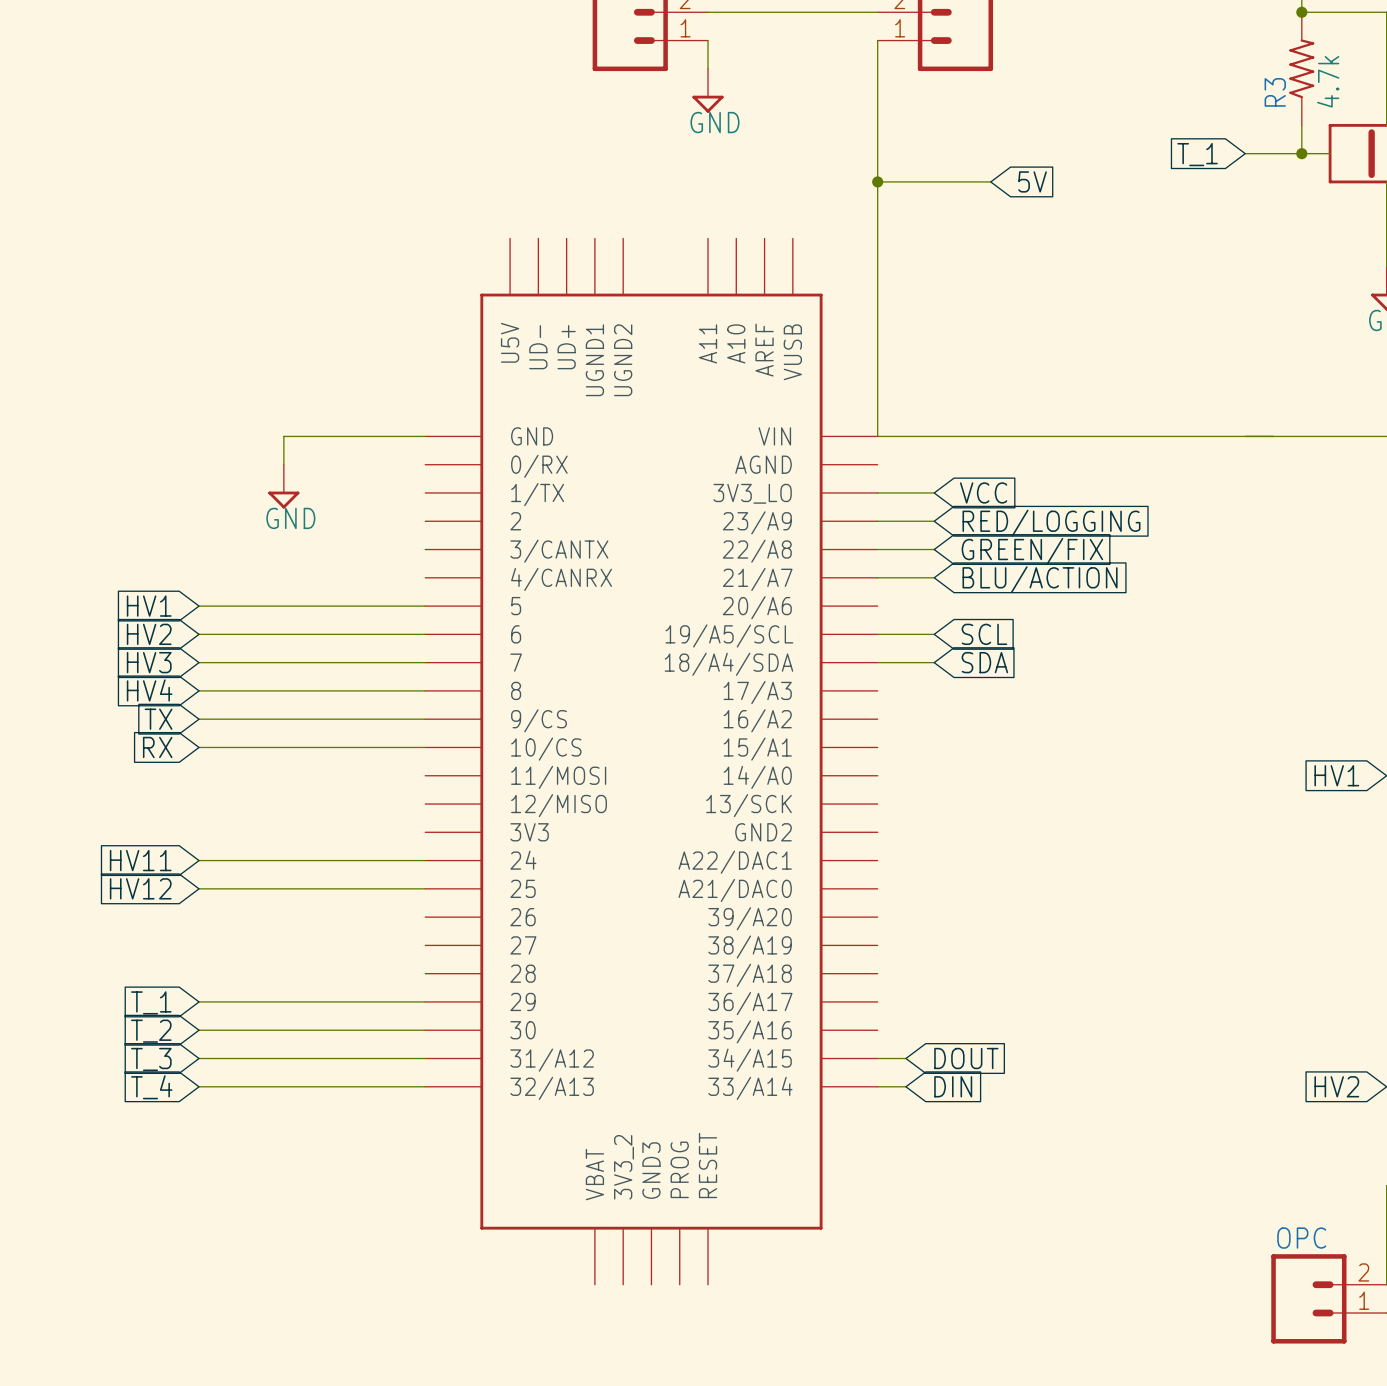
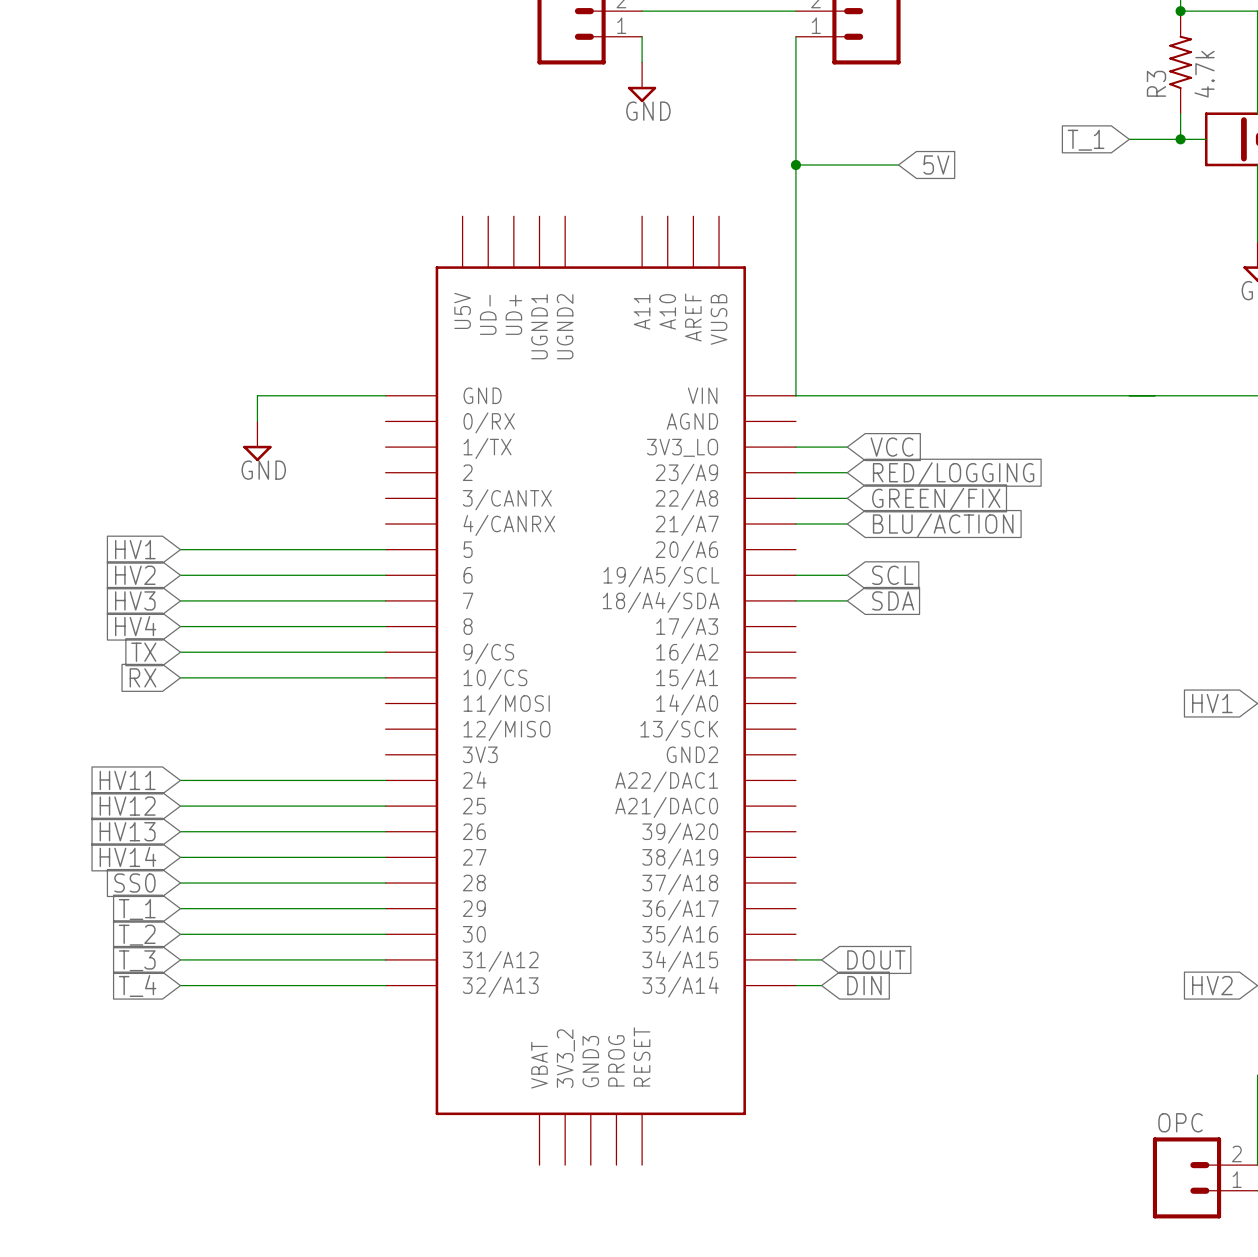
global label: none -> HV13 (127, 831)
wire: none -> (180, 831) (385, 831)
global label: none -> HV14 (128, 856)
wire: none -> (180, 857) (385, 857)
global label: none -> SS0 (134, 883)
wire: none -> (180, 883) (385, 883)

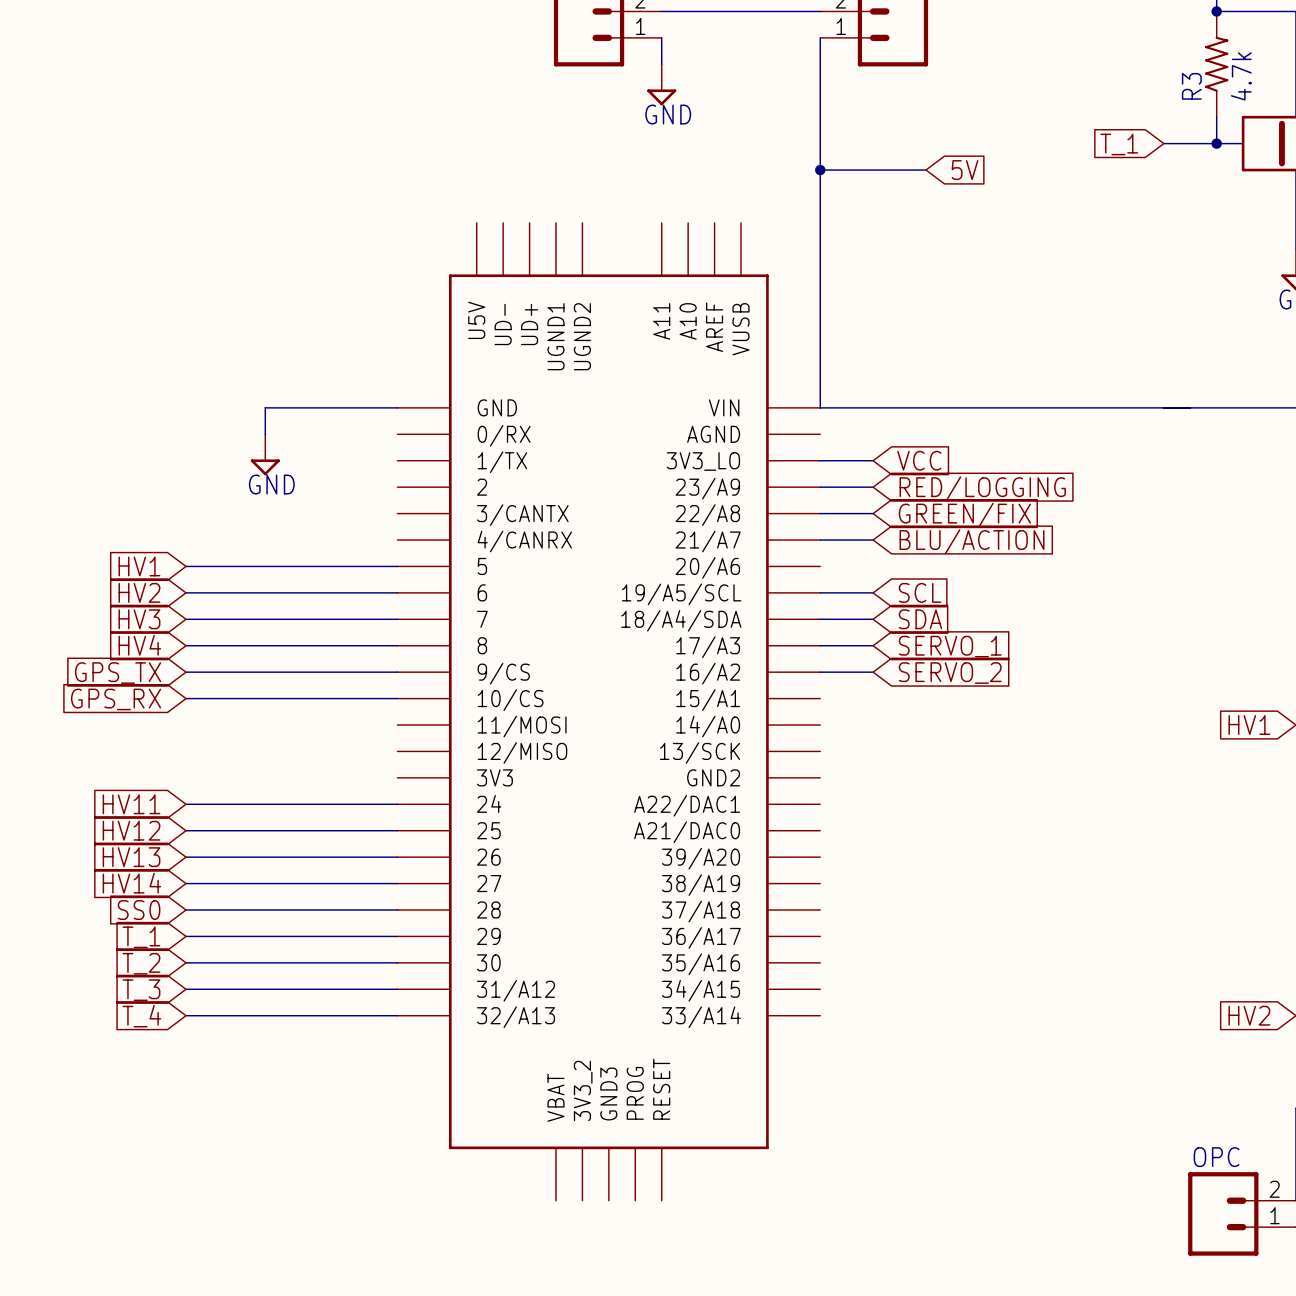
wire: none -> (820, 645) (873, 645)
global label: none -> SERVO_1 (950, 646)
global label: TX (143, 652) -> GPS_TX (118, 673)
wire: none -> (820, 672) (873, 672)
global label: none -> SERVO_2 (950, 673)
global label: RX (143, 677) -> GPS_RX (116, 699)
wire: (795, 959) (821, 959) -> none
global label: DOUT (876, 959) -> none
wire: (795, 985) (821, 985) -> none
global label: DIN (864, 985) -> none

